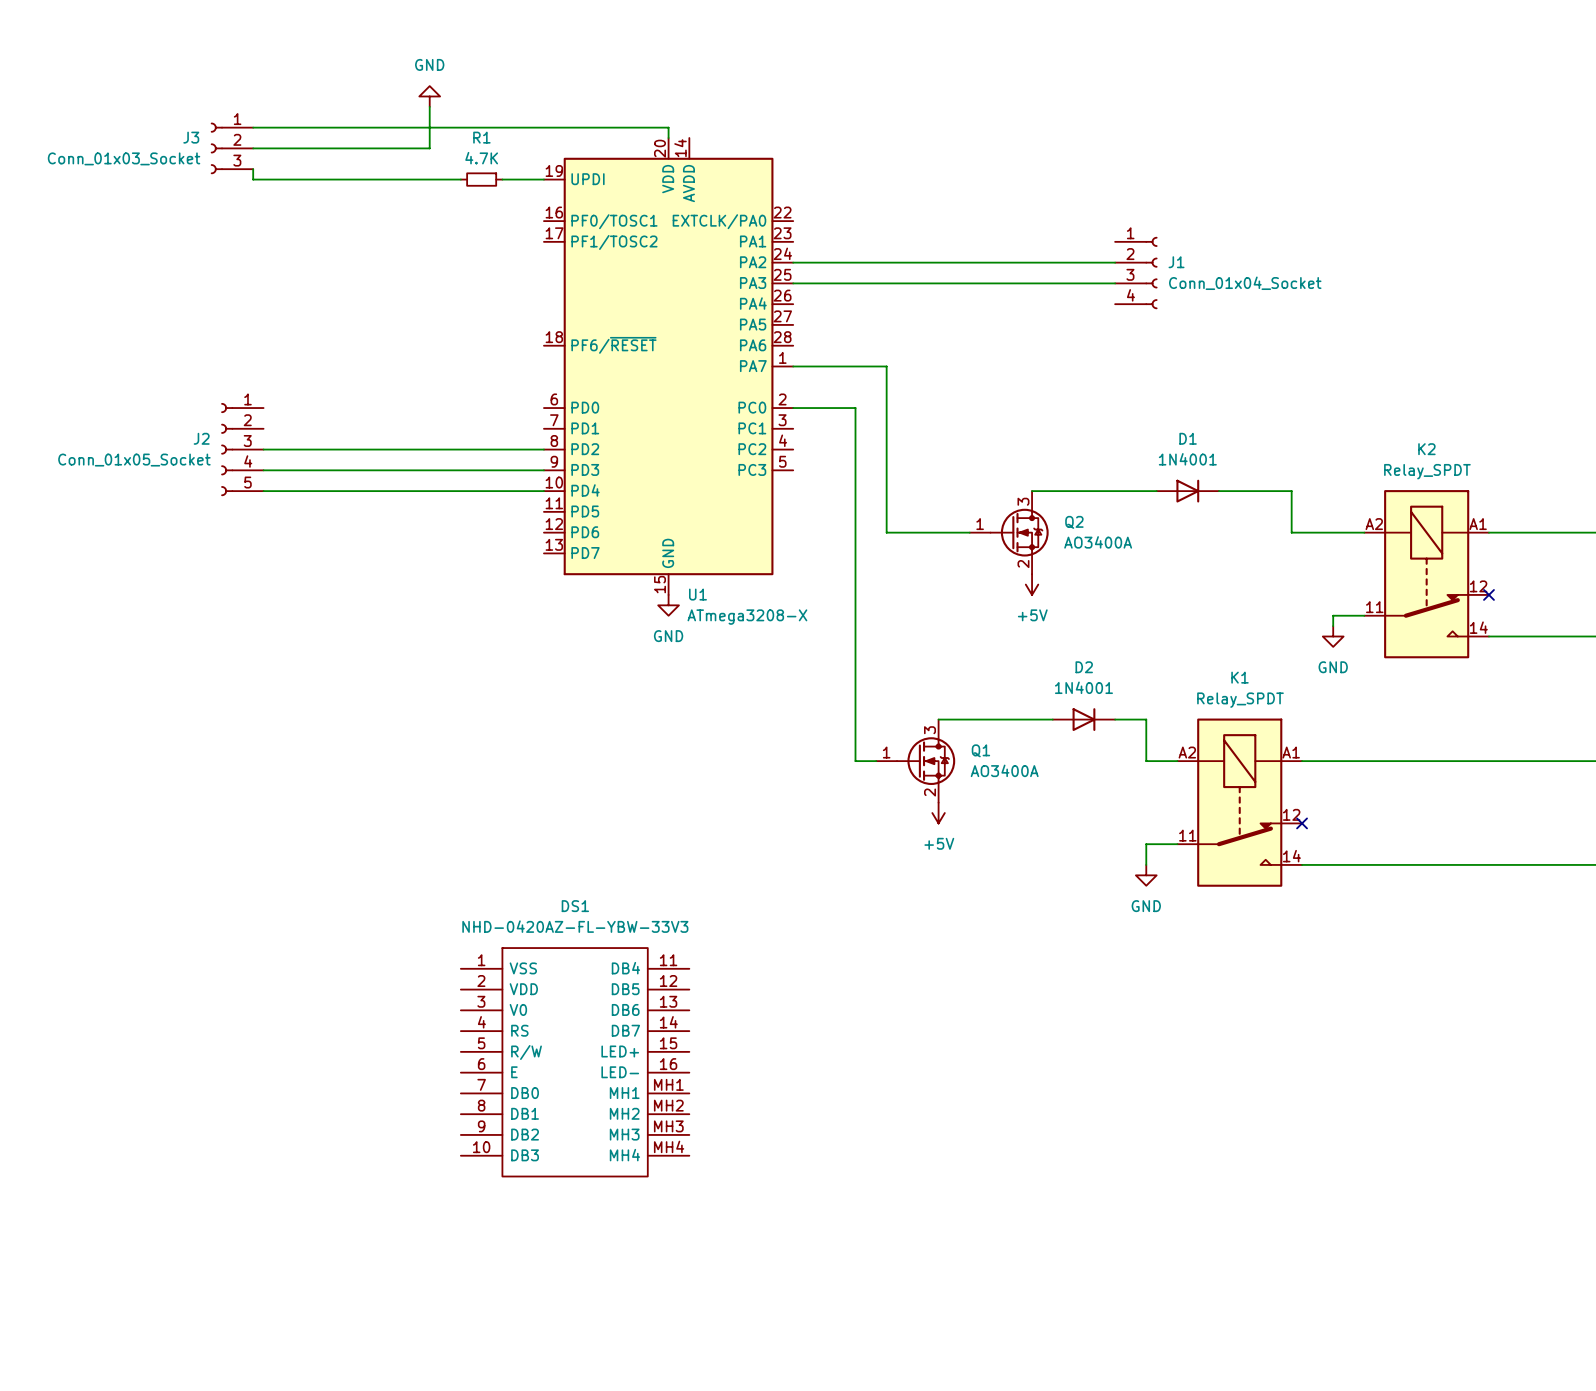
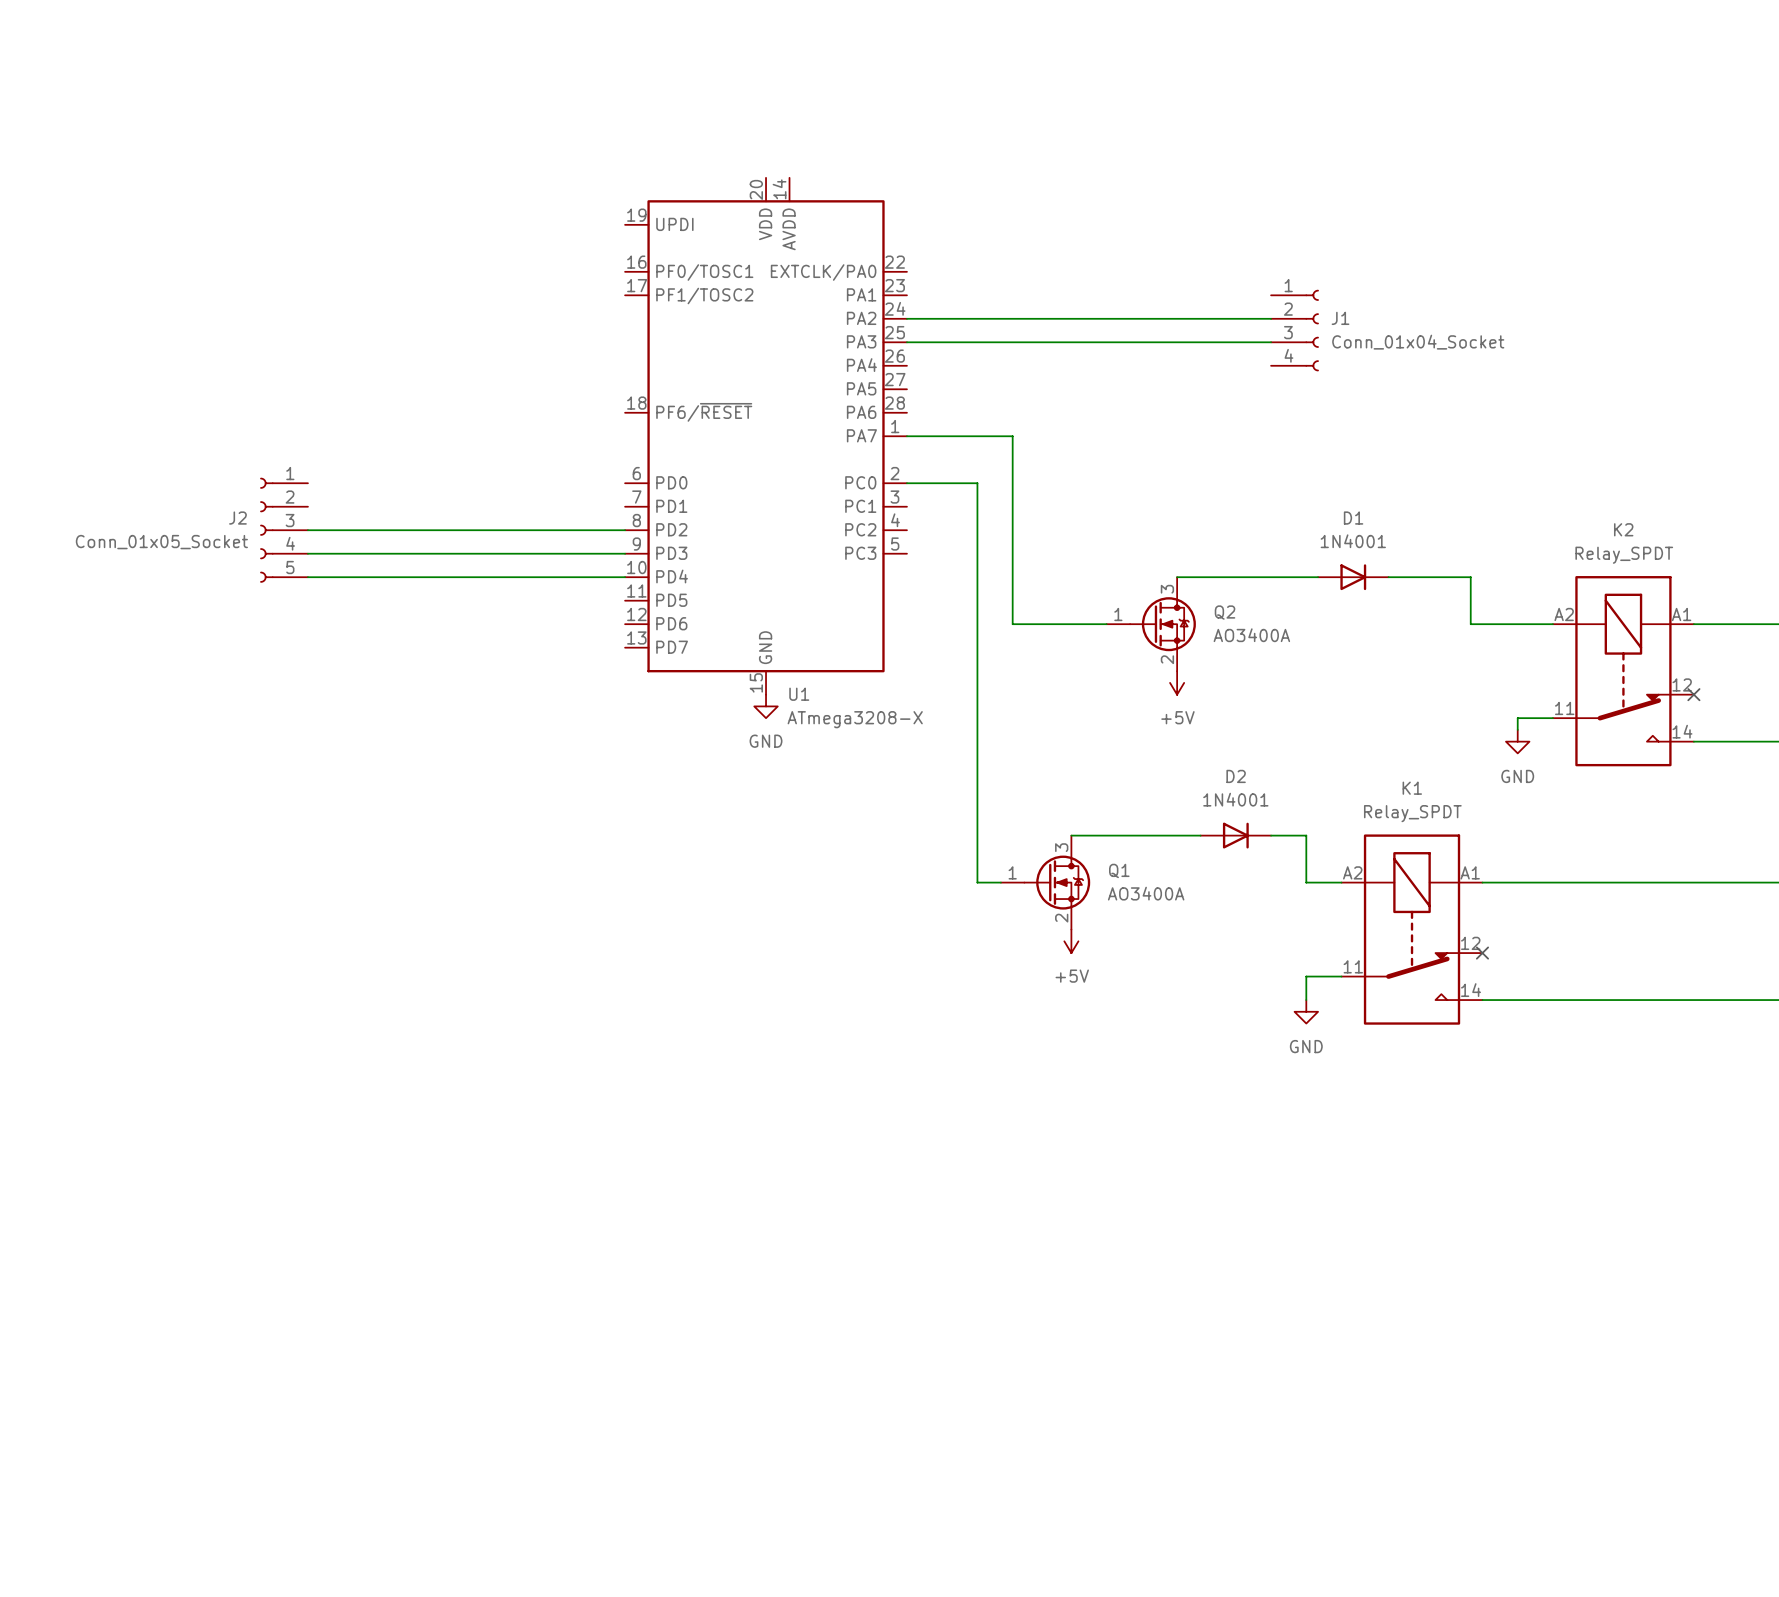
power symbol: GND (429, 96) -> none
wire: (429, 106) (429, 148) (253, 148) -> none
wire: (253, 127) (668, 127) (668, 138) -> none
J3: Conn_01x03_Socket (232, 148) -> none
wire: (253, 169) (253, 179) (460, 179) -> none
R1: 4.7K (481, 179) -> none
wire: (502, 179) (543, 179) -> none
DS1: NHD-0420AZ-FL-YBW-33V3 (575, 1062) -> none

